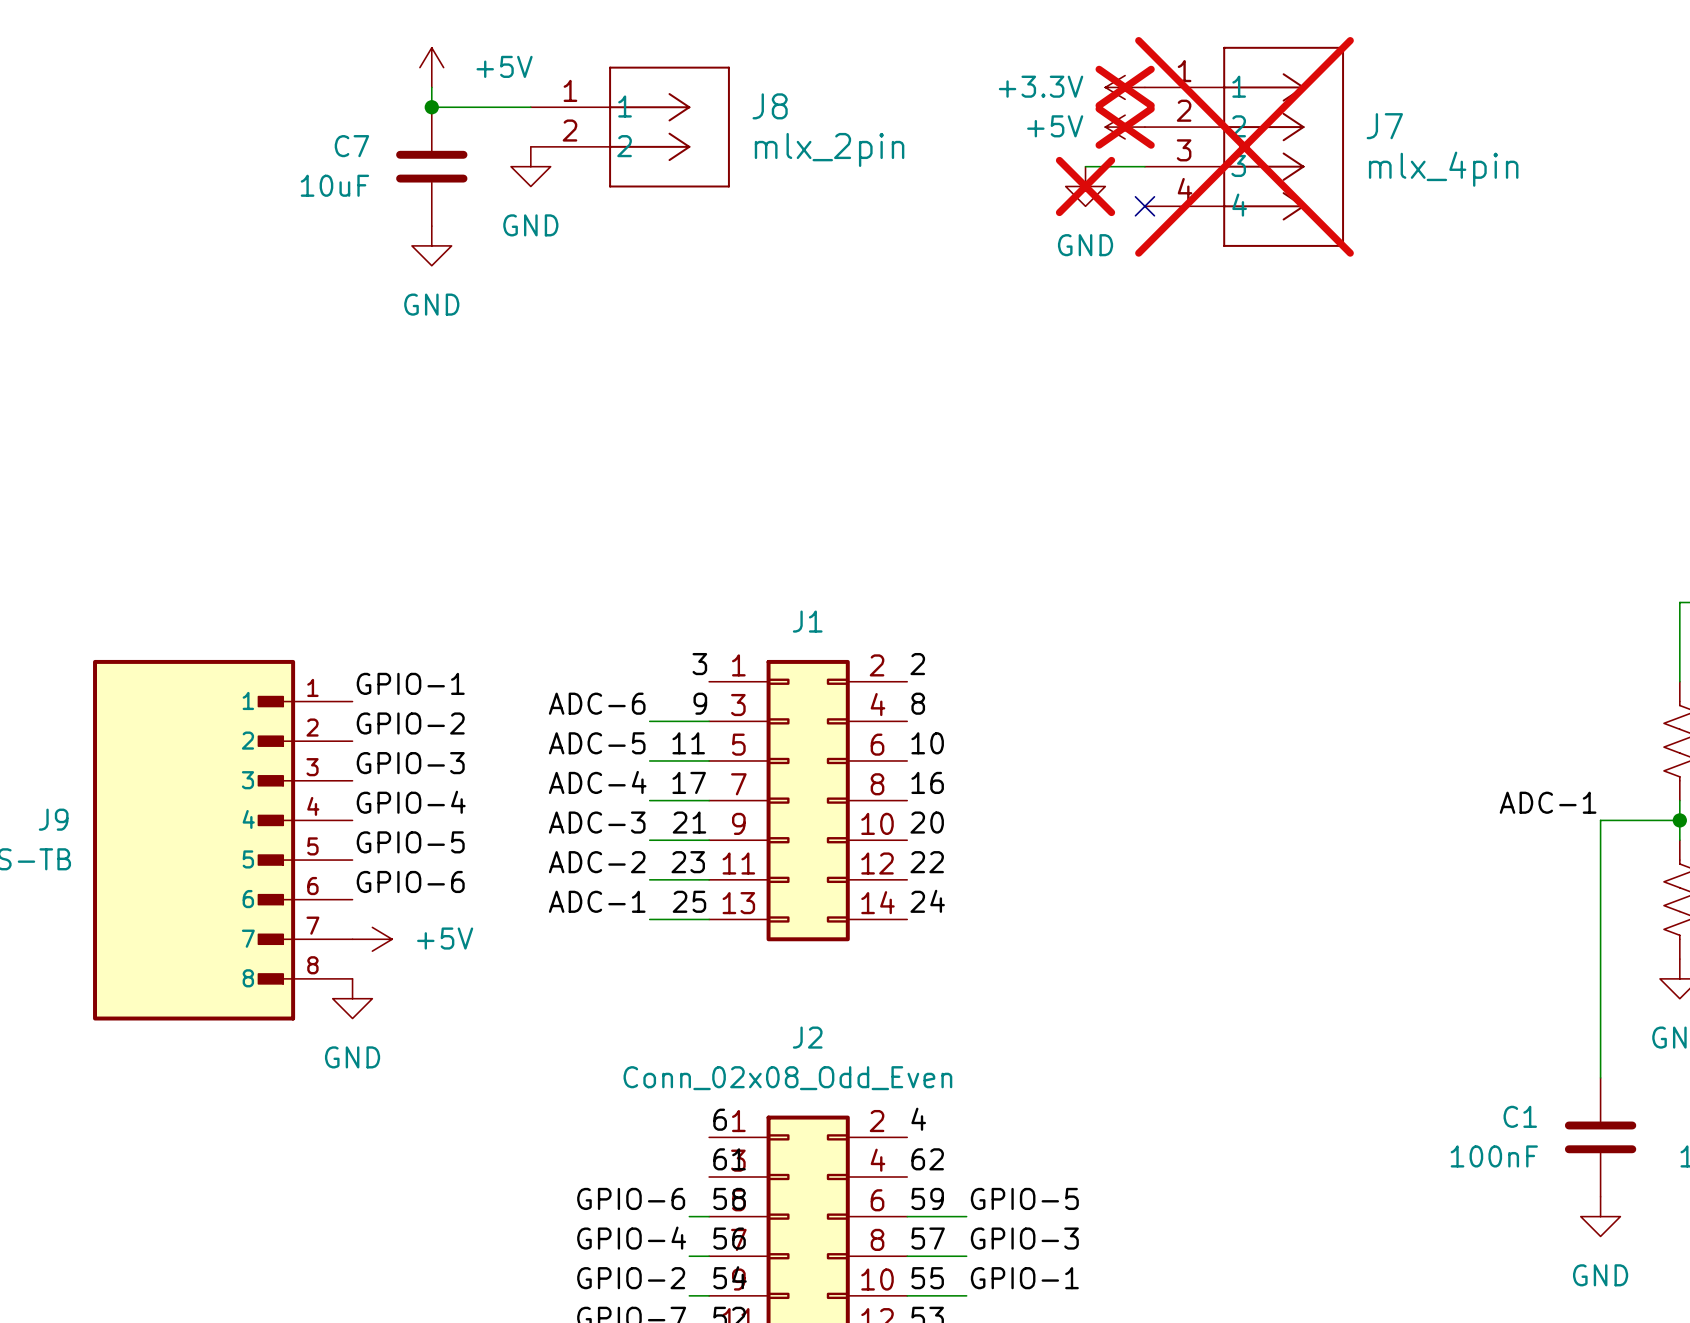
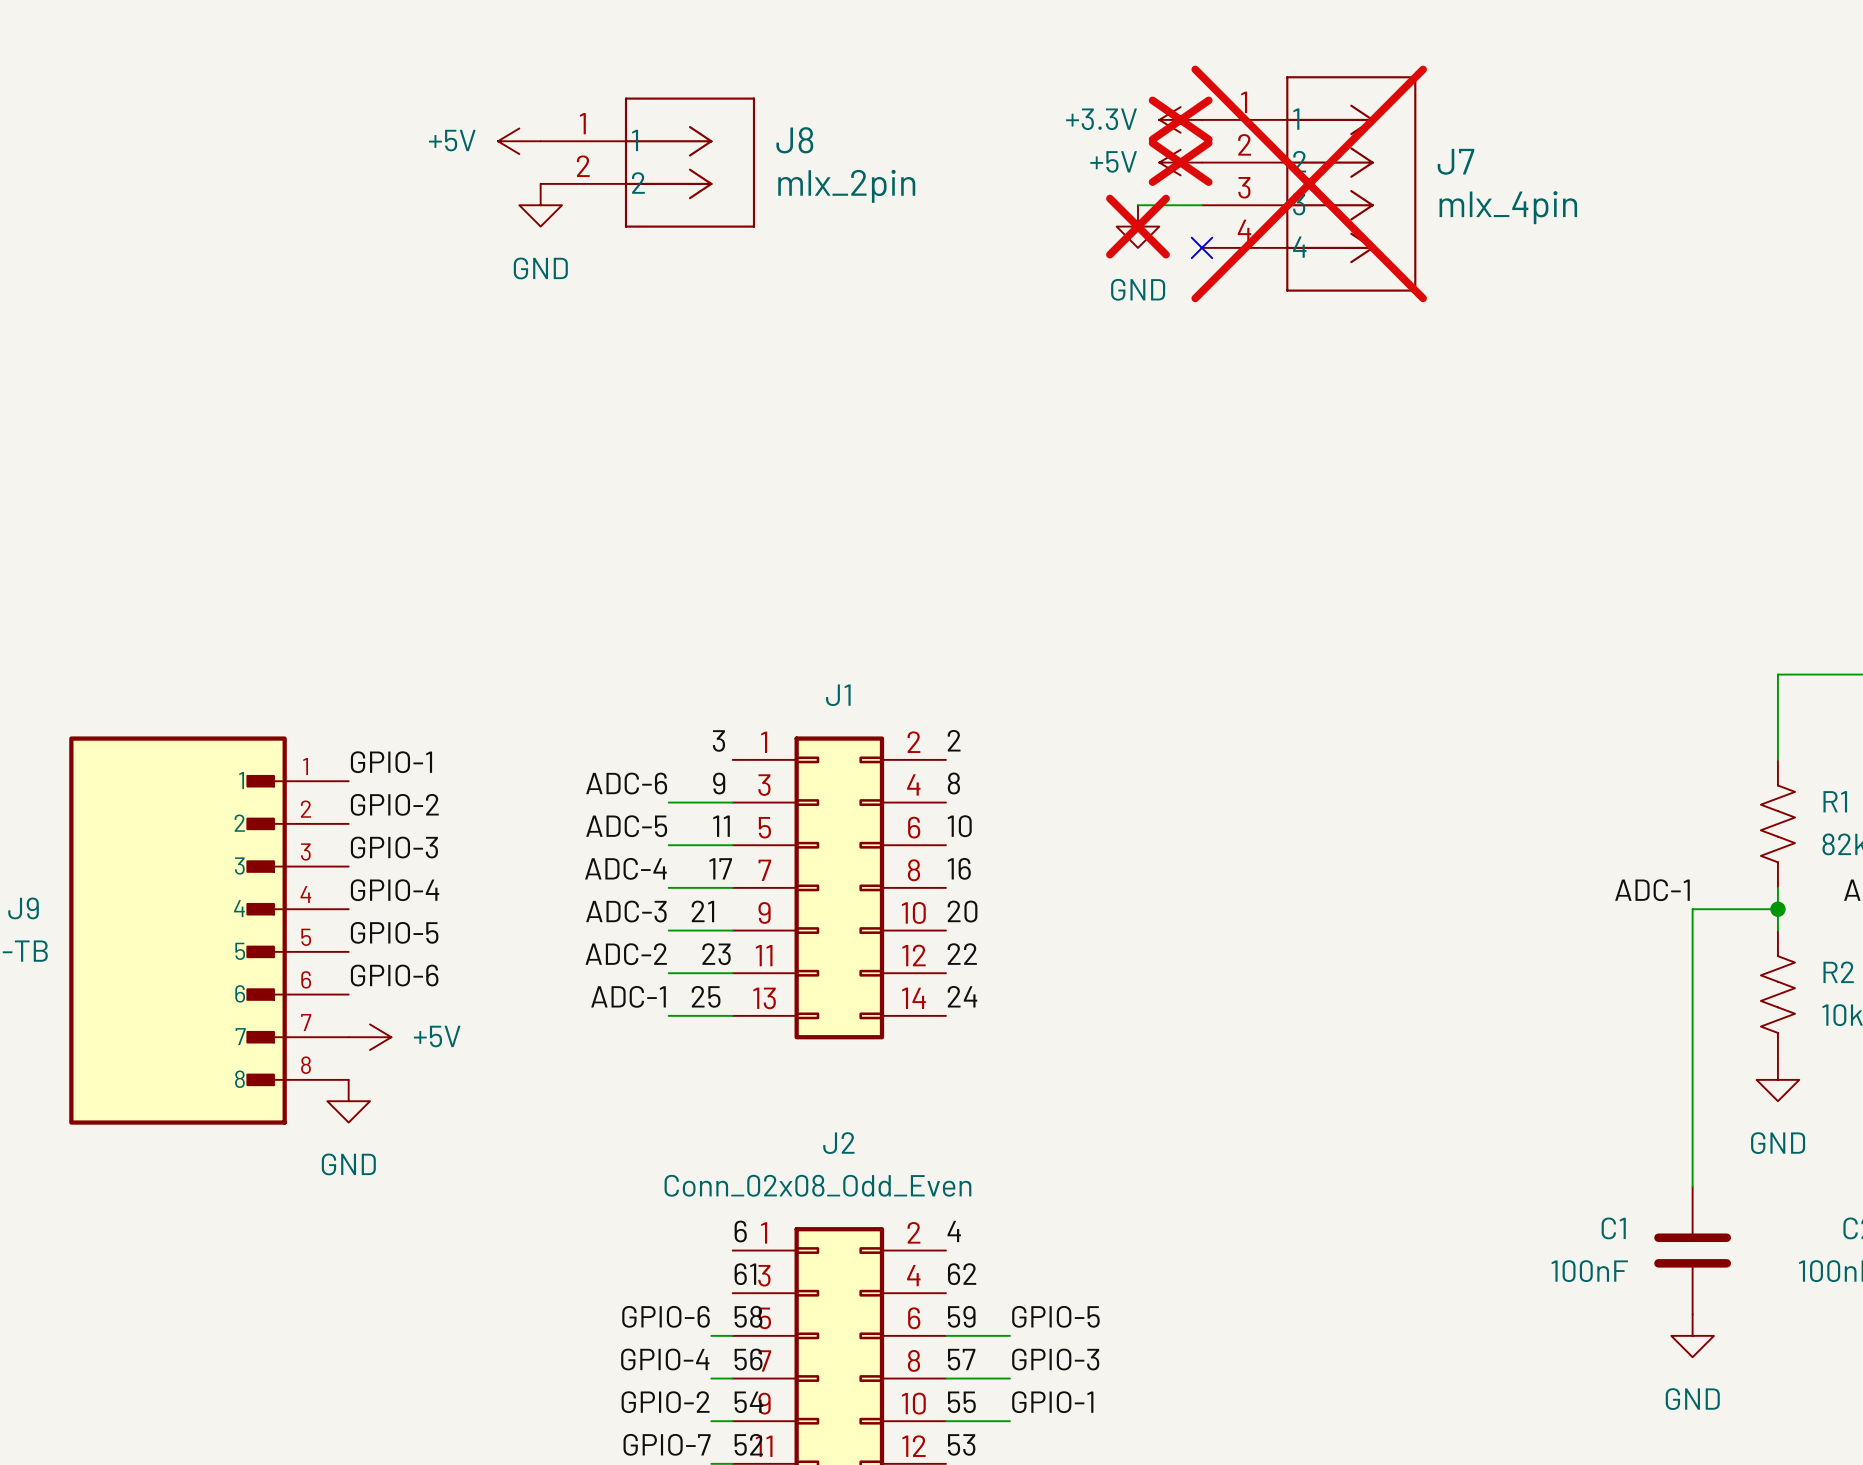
power symbol text position: +5V (504, 66) -> +5V (452, 140)
power symbol rotation: 0° (431, 67) -> 90° counterclockwise (519, 141)
power symbol position: +5V (431, 67) -> +5V (519, 141)
wire: (431, 87) (431, 107) (530, 107) -> none
junction: (431, 107) -> none
C7: 10uF (431, 166) -> none
power symbol: GND (431, 245) -> none

